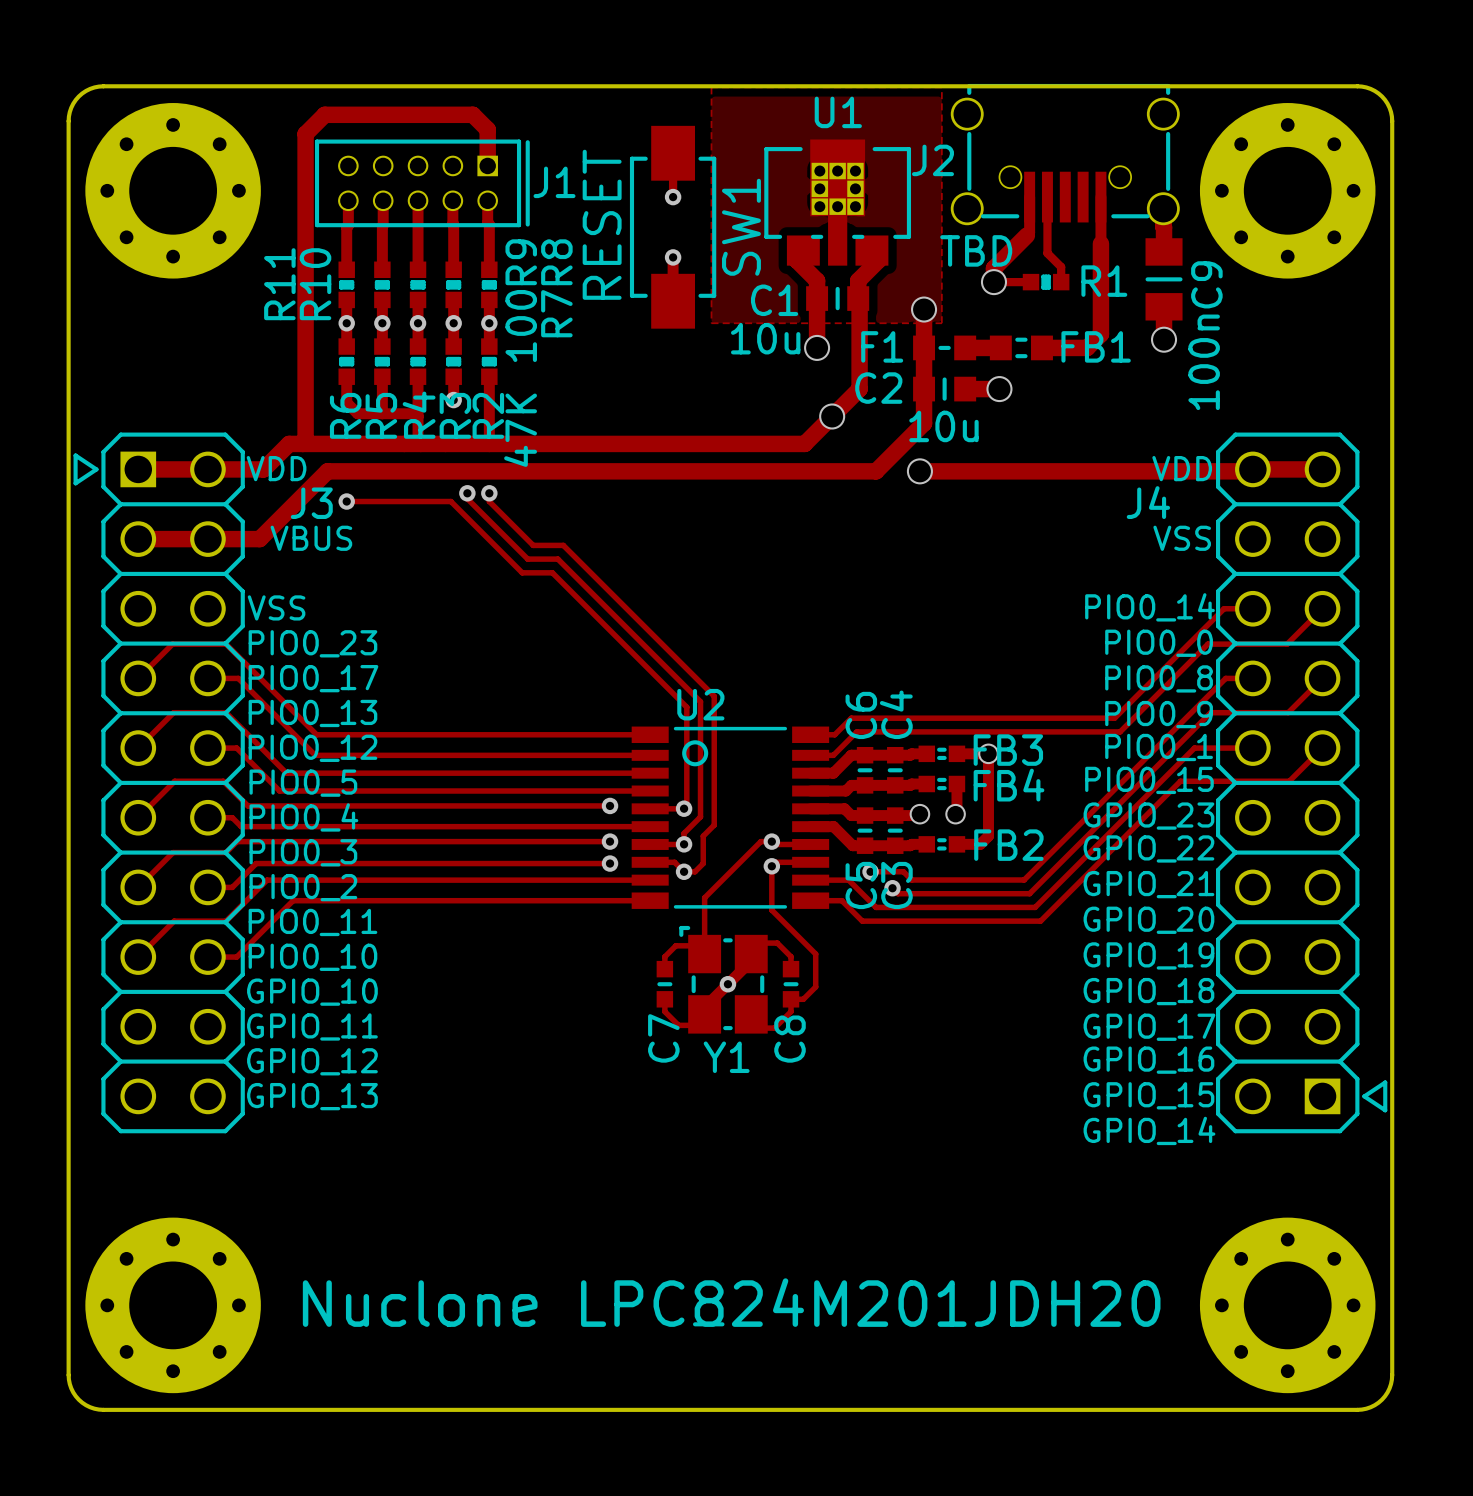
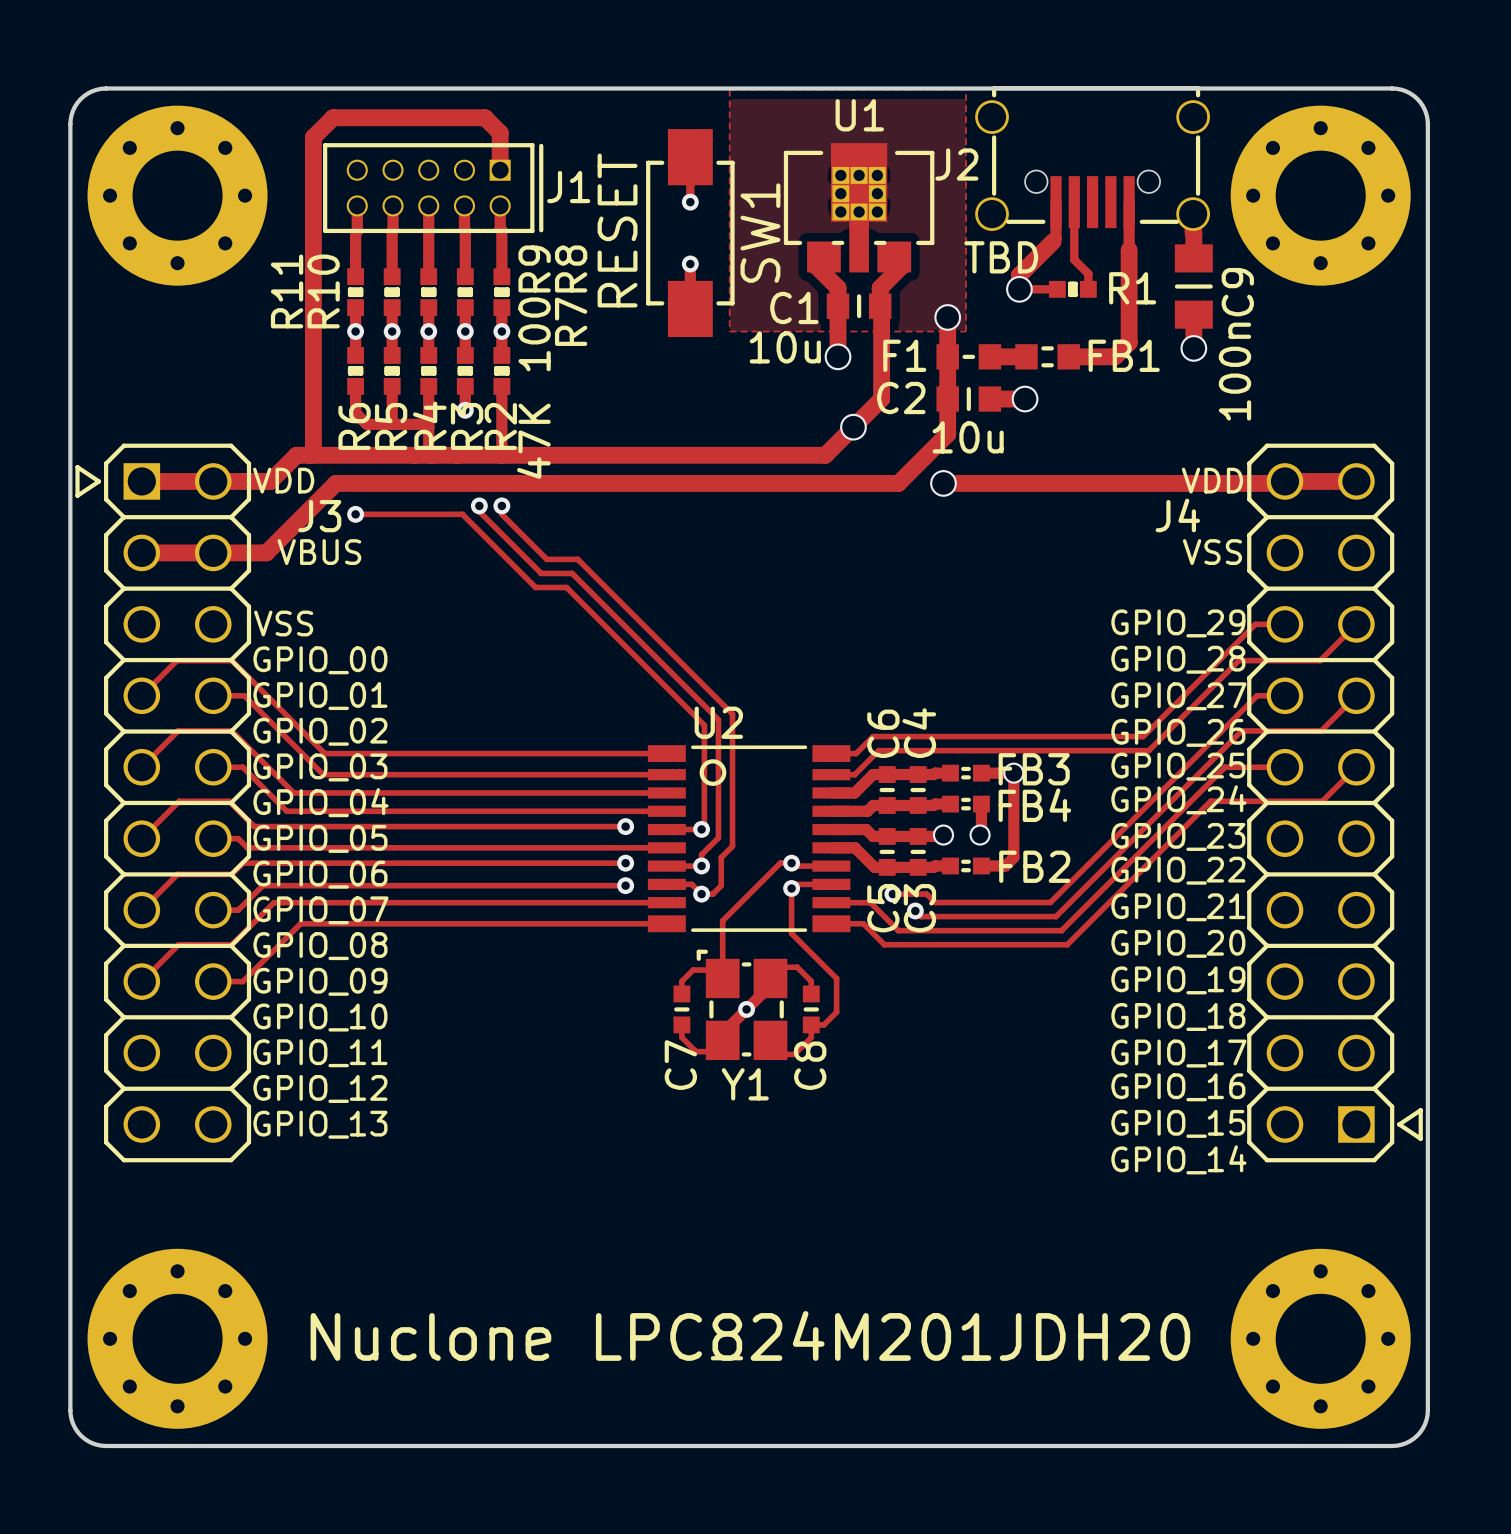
J3 footprint: [73, 432, 245, 1134] -> [75, 443, 252, 1163]
J4 footprint: [1216, 432, 1388, 1134] -> [1247, 443, 1423, 1163]

